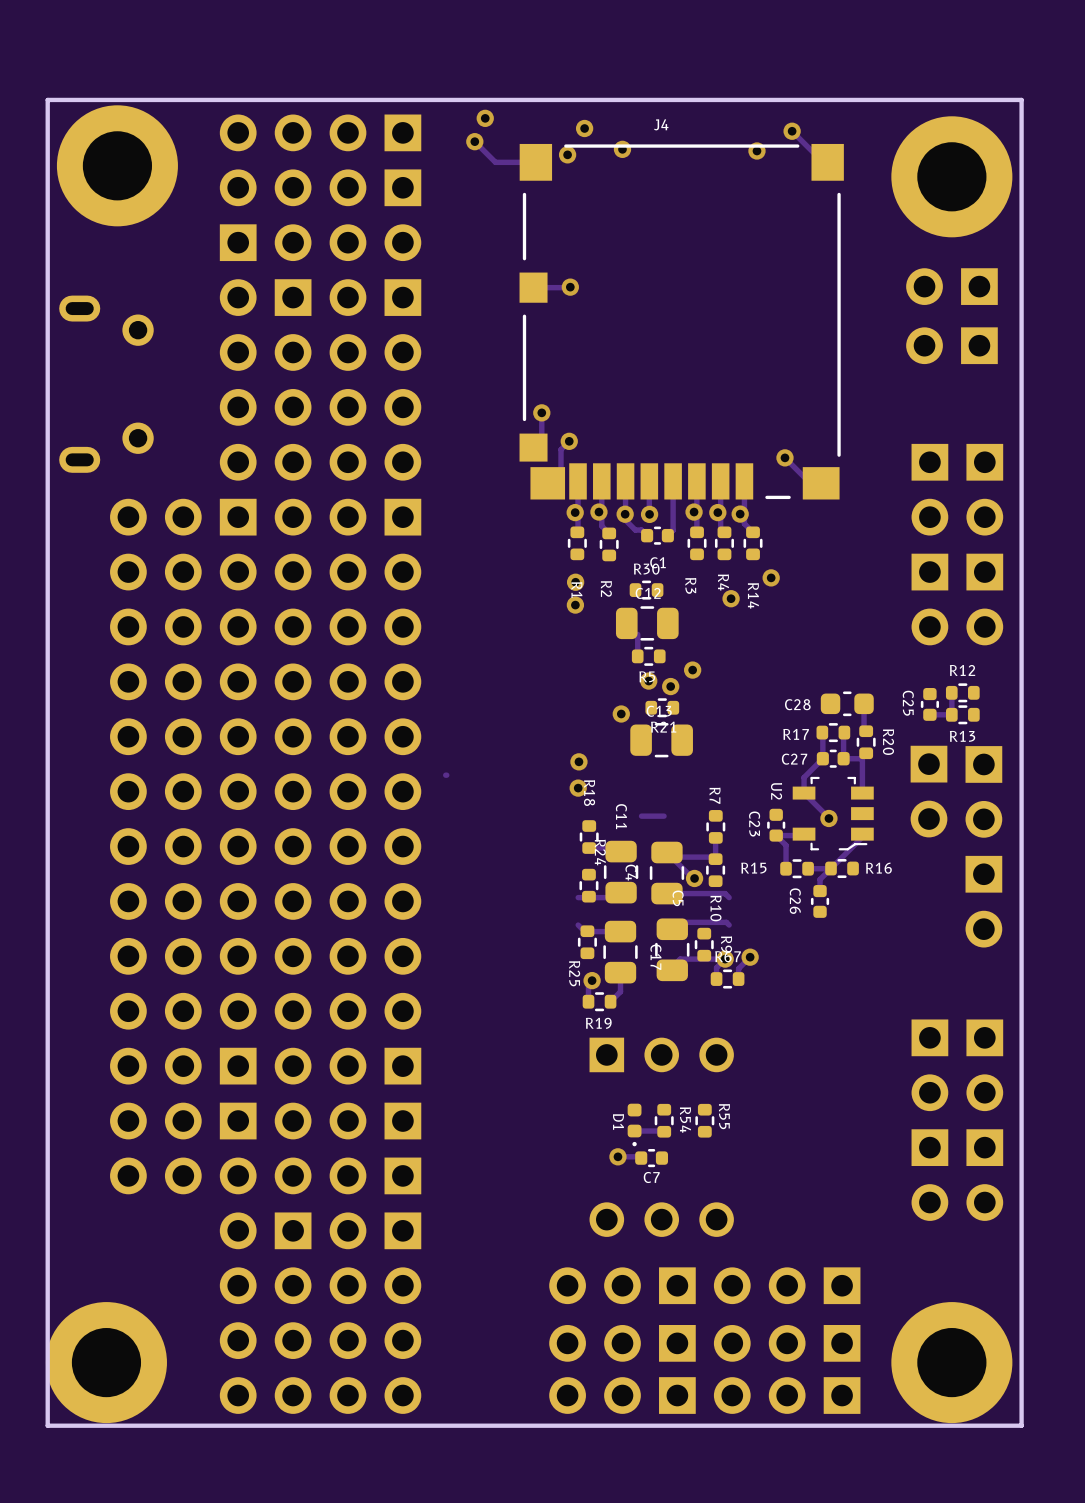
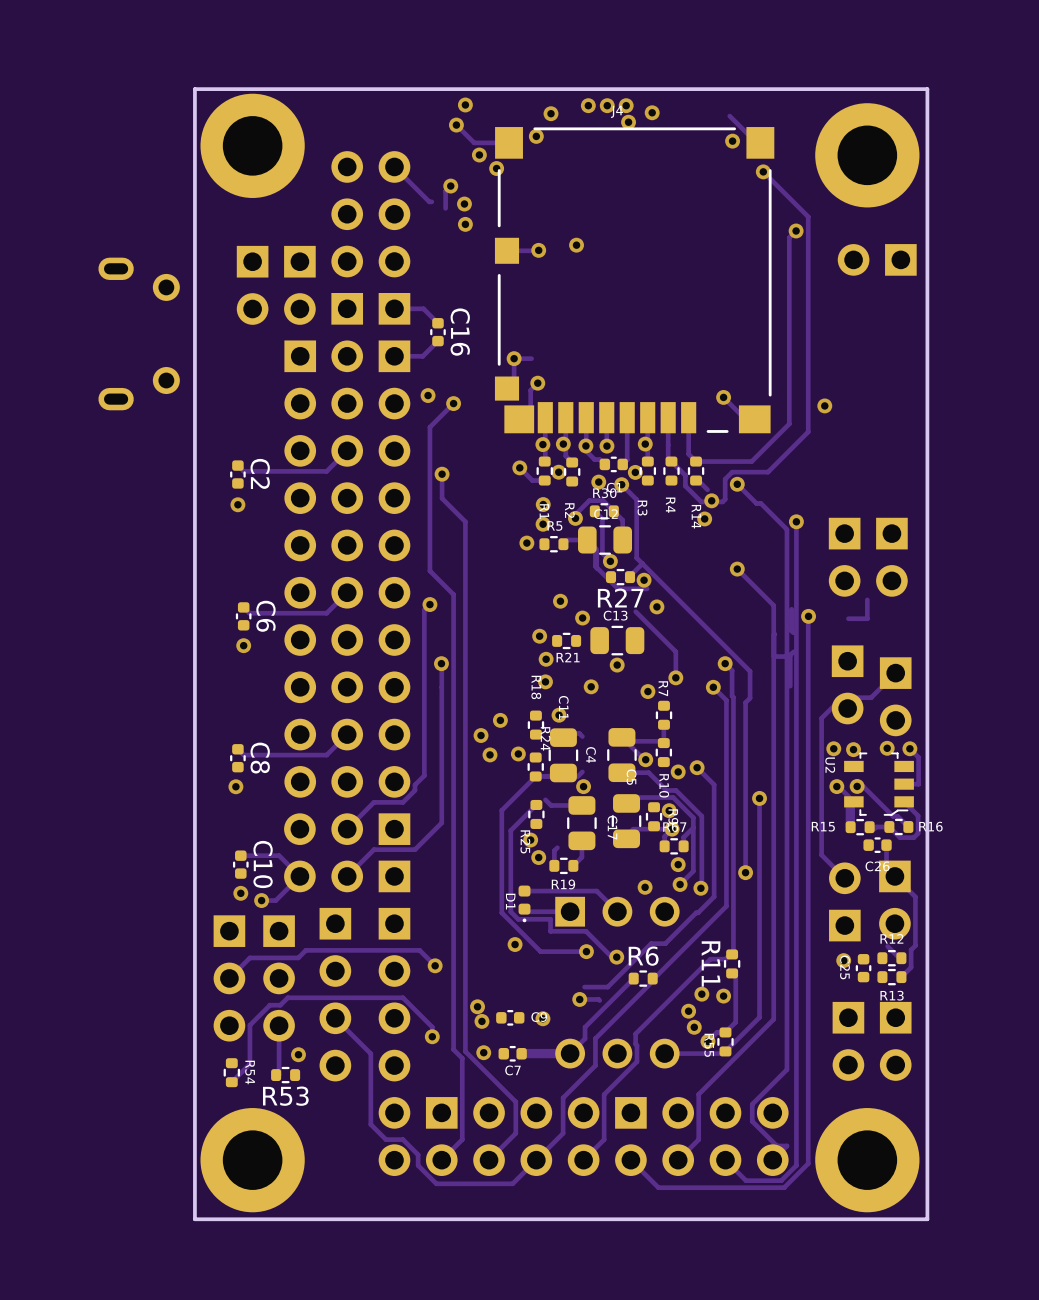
board edge: (171, 99) (47, 99) (47, 1425) (1021, 1425) (1021, 1411) -> (194, 89) (194, 1219) (927, 1219)
via: none -> (588, 105)
via: none -> (607, 105)
via: none -> (626, 105)
via: none -> (652, 112)
via: (792, 131) -> none
part: (320, 132) -> none
via: none -> (628, 122)
via: (622, 149) -> none
via: (756, 151) -> none
via: none -> (732, 141)
part position: (117, 165) -> (252, 145)
via: none -> (479, 155)
part: (320, 187) -> none
track: none -> (394, 166) (429, 201) (431, 201)
via: none -> (496, 168)
track: none -> (763, 171) (808, 216) (808, 431) (768, 472) (732, 472) (725, 479) (725, 499) (722, 501) (701, 501) (685, 486) (685, 475) (671, 461)
via: none -> (763, 171)
track: none -> (450, 186) (445, 191) (445, 208)
via: none -> (450, 186)
via: none -> (464, 204)
part rotation: 0° (320, 242) -> 90° counterclockwise (347, 237)
via: none -> (465, 224)
track: none -> (796, 230) (789, 237) (789, 423) (751, 461) (696, 461)
via: none -> (796, 230)
part: none -> (394, 237)
via: none -> (576, 245)
part position: (951, 286) -> (877, 259)
part: none -> (252, 285)
part: none -> (299, 285)
part: (951, 345) -> none
track: none -> (394, 308) (423, 308) (437, 323)
part: (320, 379) -> none
C16: none -> (437, 332)
track: none -> (437, 341) (422, 356) (394, 356)
track: none -> (531, 358) (514, 358)
via: none -> (428, 395)
track: none -> (453, 403) (429, 427) (429, 570) (453, 594) (453, 1049) (462, 1058) (462, 1139) (441, 1160)
via: none -> (453, 403)
via: none -> (824, 405)
via: (717, 512) -> none
via: (740, 514) -> none
track: none -> (347, 450) (326, 471) (243, 471) (237, 465)
track: none -> (519, 467) (532, 480) (544, 480)
via: none -> (519, 467)
via: none -> (558, 472)
via: none -> (635, 472)
part: (929, 544) -> none
part: (984, 544) -> none
C2: none -> (237, 474)
track: none -> (442, 474) (442, 498) (465, 521) (465, 1051) (515, 1101) (515, 1133) (489, 1160)
via: none -> (442, 474)
track: none -> (696, 480) (707, 489)
via: none -> (598, 482)
track: none -> (737, 484) (756, 503) (760, 503) (786, 529) (786, 1069) (752, 1104) (752, 1121) (776, 1145) (786, 1145) (772, 1160)
via: none -> (737, 484)
track: none -> (621, 484) (636, 499) (636, 558) (750, 671) (750, 698) (745, 702) (745, 872)
via: none -> (621, 484)
via: none -> (237, 504)
track: none -> (594, 511) (602, 518) (602, 553) (610, 561)
track: none -> (575, 518) (575, 514) (589, 500) (603, 500) (622, 520) (622, 540)
via: none -> (575, 518)
via position: (731, 598) -> (704, 518)
track: none -> (796, 521) (796, 1165) (781, 1180) (746, 1180) (725, 1160)
via: none -> (796, 521)
via: none -> (526, 543)
track: none -> (563, 544) (567, 540) (587, 540) (595, 548) (595, 566) (618, 588) (647, 588)
part: none -> (844, 557)
part: none -> (891, 557)
via: none -> (610, 561)
track: none -> (642, 563) (630, 577)
R5 position: (648, 656) -> (553, 544)
part: none -> (300, 569)
part: none -> (370, 569)
track: none -> (737, 569) (773, 605) (773, 1019) (698, 1094) (698, 1139) (678, 1160)
via: none -> (737, 569)
R27: none -> (620, 577)
R5 name position: R5 (647, 676) -> R5 (554, 525)
via: (648, 681) -> none
track: none -> (347, 592) (326, 613) (249, 613) (243, 607)
via: (670, 686) -> none
R12 position: (962, 692) -> (891, 958)
via: none -> (560, 601)
track: none -> (429, 604) (424, 610) (424, 775) (414, 784) (414, 790) (402, 802) (373, 802) (347, 829)
via: none -> (429, 604)
via: none -> (656, 606)
C28: (847, 703) -> none
C25 position: (929, 704) -> (863, 968)
track: none -> (635, 611) (675, 651) (675, 677)
R21 position: (662, 707) -> (566, 640)
C6: none -> (243, 616)
track: none -> (808, 616) (808, 1163) (784, 1187) (658, 1187) (630, 1160)
via: none -> (808, 616)
R13 position: (962, 714) -> (891, 977)
track: (822, 732) (822, 758) (804, 777) (804, 793) (828, 818) -> none
R17: (833, 732) -> none
via: none -> (539, 636)
R20: (866, 742) -> none
via: none -> (243, 645)
C27: (833, 758) -> none
part: (265, 764) -> none
track: none -> (441, 663) (441, 822) (414, 849) (373, 849) (347, 876)
via: none -> (441, 663)
track: none -> (725, 663) (732, 670) (733, 697) (733, 951) (725, 959) (710, 959) (635, 1033) (637, 1061) (604, 1094) (604, 1139) (583, 1160)
via: none -> (725, 663)
via: none -> (617, 665)
track: (446, 775) (445, 775) -> none
track: none -> (895, 673) (871, 697) (842, 697) (821, 718) (821, 855) (844, 878)
via: none -> (675, 677)
via: none -> (591, 686)
track: none -> (713, 687) (726, 700) (726, 906) (657, 975)
via: none -> (713, 687)
via: none -> (647, 691)
part: none -> (895, 696)
U2 position: (833, 813) -> (879, 784)
track: (664, 816) (641, 816) -> none
via: (828, 818) -> none
C23: (776, 825) -> none
via: none -> (559, 715)
via: none -> (500, 720)
track: (804, 834) (776, 835) (786, 845) (786, 868) -> none
track: (862, 834) (862, 837) (820, 879) (820, 891) -> none
R18 position: (589, 837) -> (535, 725)
part: (983, 846) -> none
track: none -> (347, 734) (326, 755) (243, 755) (237, 749)
via: none -> (481, 735)
via: none -> (833, 748)
via: none -> (887, 748)
track: none -> (909, 748) (918, 757) (918, 784) (904, 784)
via: none -> (909, 748)
via: none -> (853, 749)
R15 position: (797, 868) -> (860, 827)
track: (830, 868) (808, 868) -> none
R16 position: (842, 868) -> (898, 826)
via: none -> (518, 753)
via: none -> (490, 754)
C11 position: (621, 872) -> (563, 755)
C8: none -> (237, 758)
R24 position: (588, 885) -> (535, 766)
track: none -> (697, 767) (714, 784) (714, 896) (665, 943) (651, 943) (607, 987) (584, 987)
via: none -> (697, 767)
via: none -> (678, 771)
track: (698, 893) (725, 893) (729, 897) -> (648, 772) (666, 790) (676, 790) (701, 816) (700, 888)
track: none -> (559, 776) (535, 776) (501, 810) (501, 912) (540, 951) (586, 951)
C26 rotation: 0° (820, 901) -> 90° clockwise (877, 845)
C26 position: (820, 901) -> (877, 845)
via: none -> (235, 786)
via: none -> (583, 786)
track: none -> (836, 786) (853, 801) (850, 805) (850, 827)
via: none -> (836, 786)
track: none -> (857, 786) (863, 786) (893, 816) (897, 816) (908, 826)
via: none -> (857, 786)
track: none -> (759, 798) (759, 1017) (723, 1053) (664, 1053)
via: none -> (759, 798)
track: none -> (675, 799) (693, 817) (693, 871) (680, 884)
track: none -> (904, 801) (918, 815) (918, 833) (913, 837) (900, 837) (889, 826) (876, 826) (874, 828)
track: none -> (536, 804) (510, 830) (510, 911) (518, 919) (550, 919) (550, 931) (586, 931) (611, 957) (616, 957)
via: none -> (669, 810)
R25 position: (587, 942) -> (536, 814)
via: (750, 957) -> none
part: none -> (347, 829)
via: none -> (530, 840)
track: none -> (886, 845) (886, 868) (915, 896) (915, 945) (911, 949) (911, 967) (901, 977)
via: (592, 980) -> none
track: none -> (240, 855) (279, 855) (299, 876) (275, 900) (261, 900)
via: none -> (538, 857)
C10: none -> (240, 864)
via: none -> (678, 864)
via: none -> (745, 872)
part: none -> (347, 876)
via: none -> (680, 884)
via: none -> (645, 887)
via: none -> (700, 888)
track: none -> (524, 891) (596, 891) (617, 911)
via: none -> (240, 893)
via: none -> (261, 900)
part: none -> (894, 900)
part: none -> (844, 901)
track: none -> (524, 909) (527, 911) (570, 911)
part: (265, 1066) -> none
via: none -> (515, 944)
track: none -> (887, 946) (901, 958)
via: none -> (586, 951)
part footprint: [110, 1102, 422, 1140] -> [263, 915, 295, 1042]
via: none -> (616, 957)
via: none -> (843, 960)
R11: none -> (732, 963)
R55 name position: R55 (724, 1116) -> R55 (709, 1045)
track: none -> (435, 965) (419, 950) (305, 950) (298, 957) (249, 957) (229, 978)
via: none -> (435, 965)
R54 position: (664, 1120) -> (231, 1072)
R55 position: (704, 1120) -> (725, 1041)
part: (929, 1120) -> none
part: (984, 1120) -> none
D1 position: (634, 1124) -> (524, 903)
track: none -> (732, 973) (735, 977) (735, 1022) (725, 1032) (716, 1032) (707, 1041)
track: (634, 1131) (664, 1131) -> none
part: none -> (229, 978)
track: none -> (633, 978) (585, 1027) (585, 1038) (570, 1053) (521, 1053)
R6: none -> (643, 978)
track: none -> (654, 978) (595, 1038) (595, 1065) (563, 1097) (563, 1133) (512, 1183) (436, 1183) (418, 1165) (418, 1154) (402, 1139) (385, 1139) (370, 1124) (370, 1053) (335, 1018)
via: none -> (701, 994)
part: none -> (335, 994)
via: none -> (723, 996)
C7 position: (651, 1158) -> (512, 1053)
via: none -> (477, 1006)
via: none -> (688, 1011)
part rotation: 0° (265, 1175) -> 90° counterclockwise (394, 1041)
C9: none -> (510, 1017)
via: none -> (542, 1018)
via: none -> (481, 1021)
track: none -> (279, 1025) (279, 1074)
via: none -> (694, 1027)
track: none -> (432, 1036) (432, 1027) (402, 997) (287, 997) (280, 1005) (269, 1005) (249, 1025) (249, 1064) (231, 1082)
via: none -> (432, 1036)
via: none -> (707, 1041)
part: none -> (848, 1041)
part: none -> (895, 1041)
via: none -> (483, 1052)
via: none -> (298, 1054)
R53: none -> (285, 1075)
part: (704, 1285) -> none
part: (320, 1313) -> none
part: none -> (512, 1136)
part: none -> (701, 1136)
part: (704, 1343) -> none
part position: (106, 1362) -> (252, 1160)
part position: (951, 1362) -> (867, 1160)
part: (704, 1395) -> none

